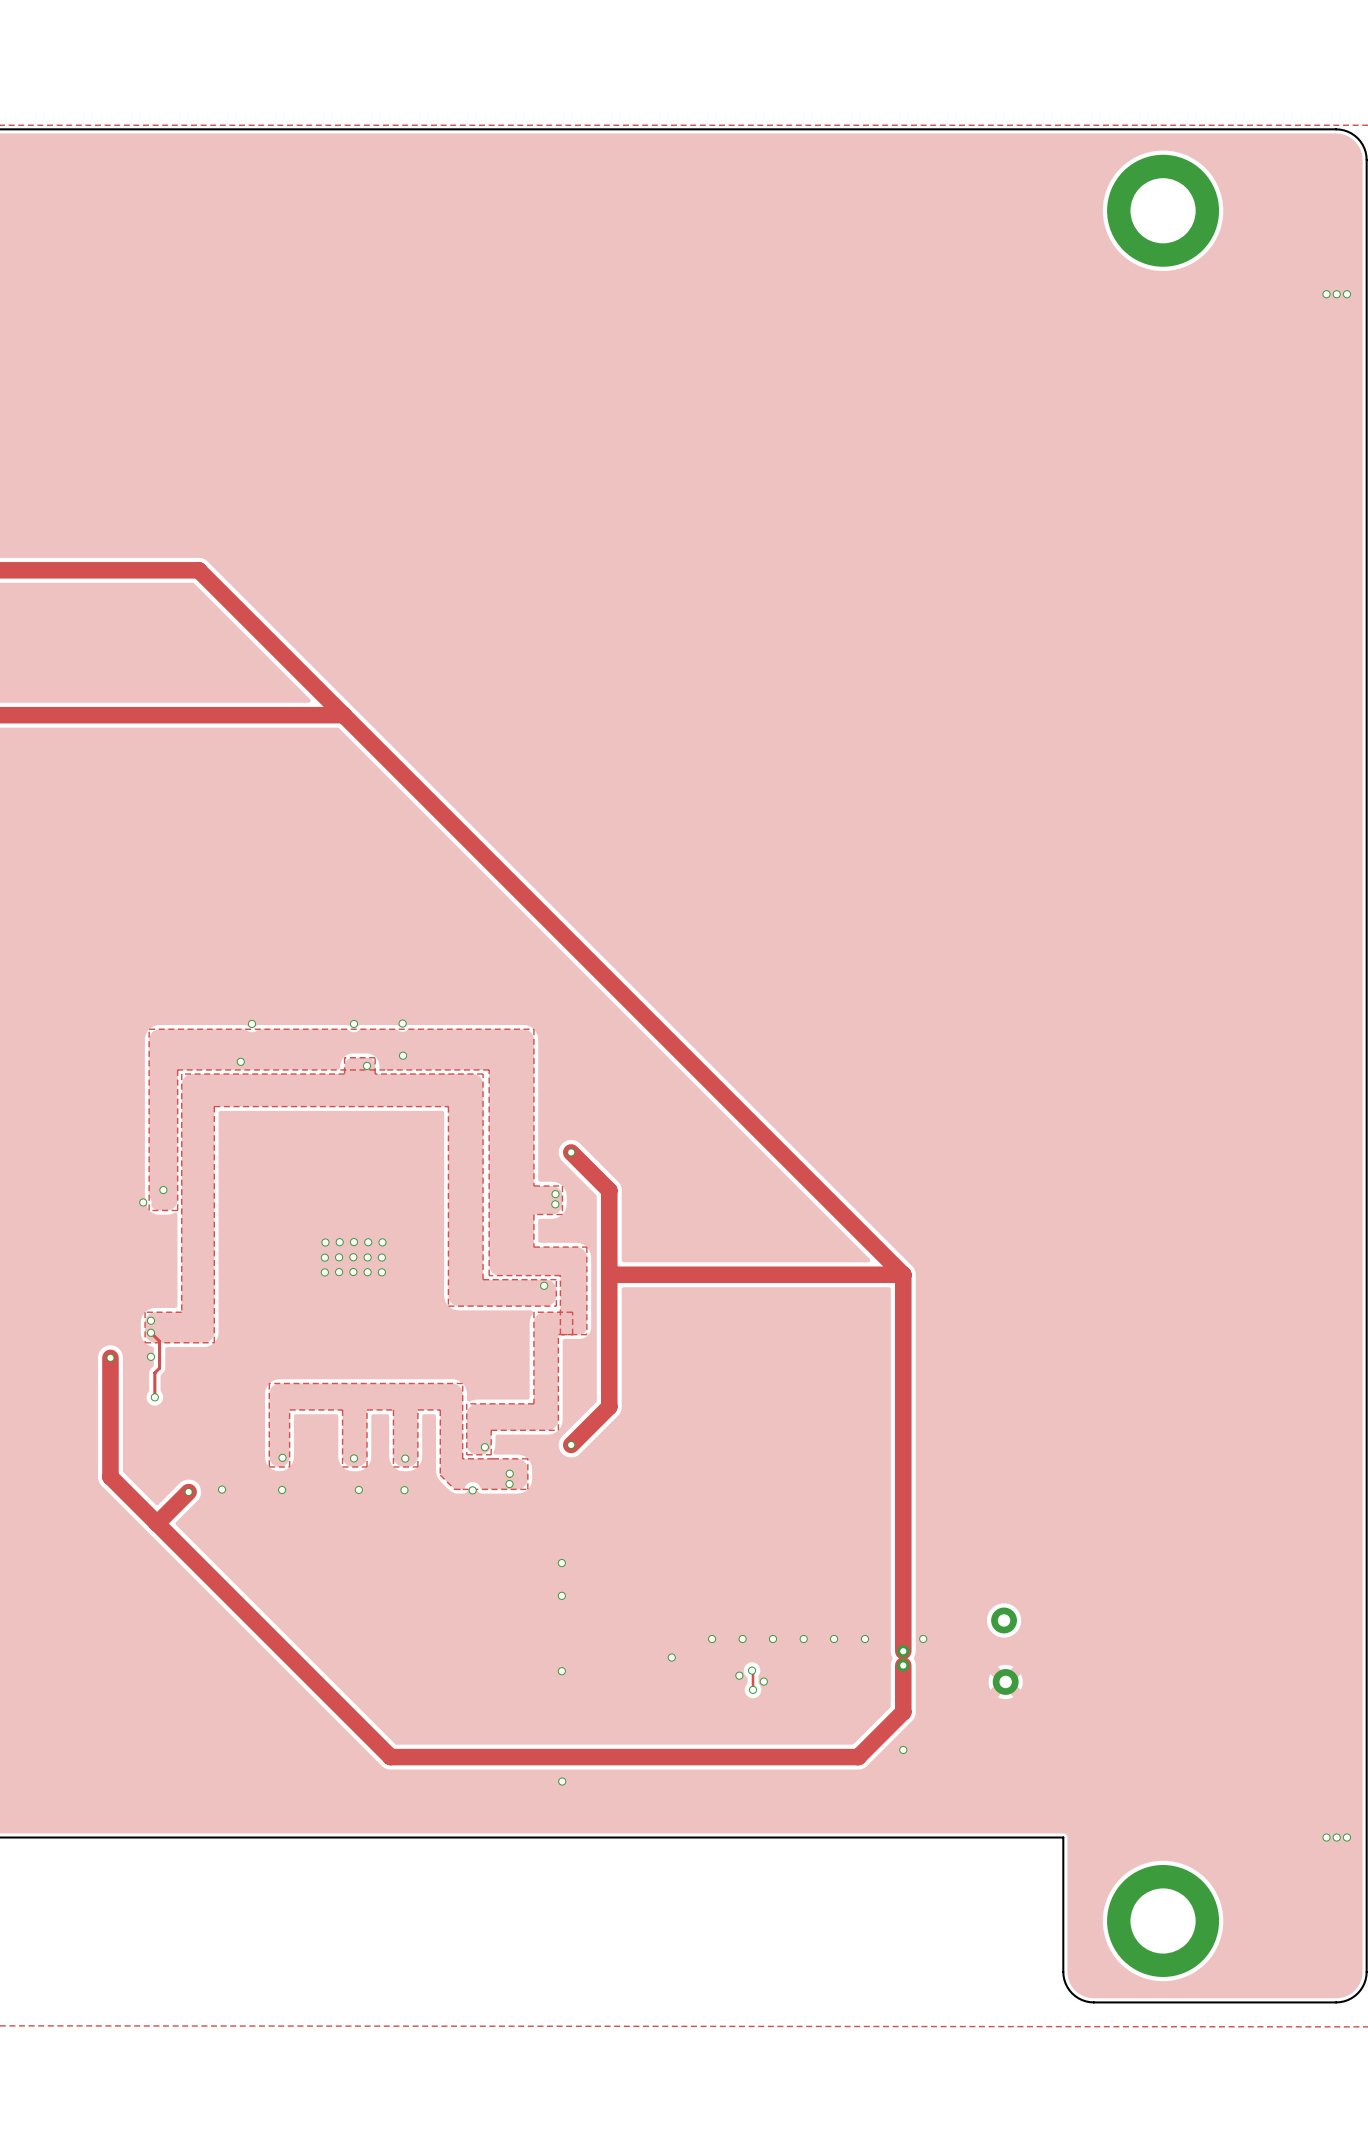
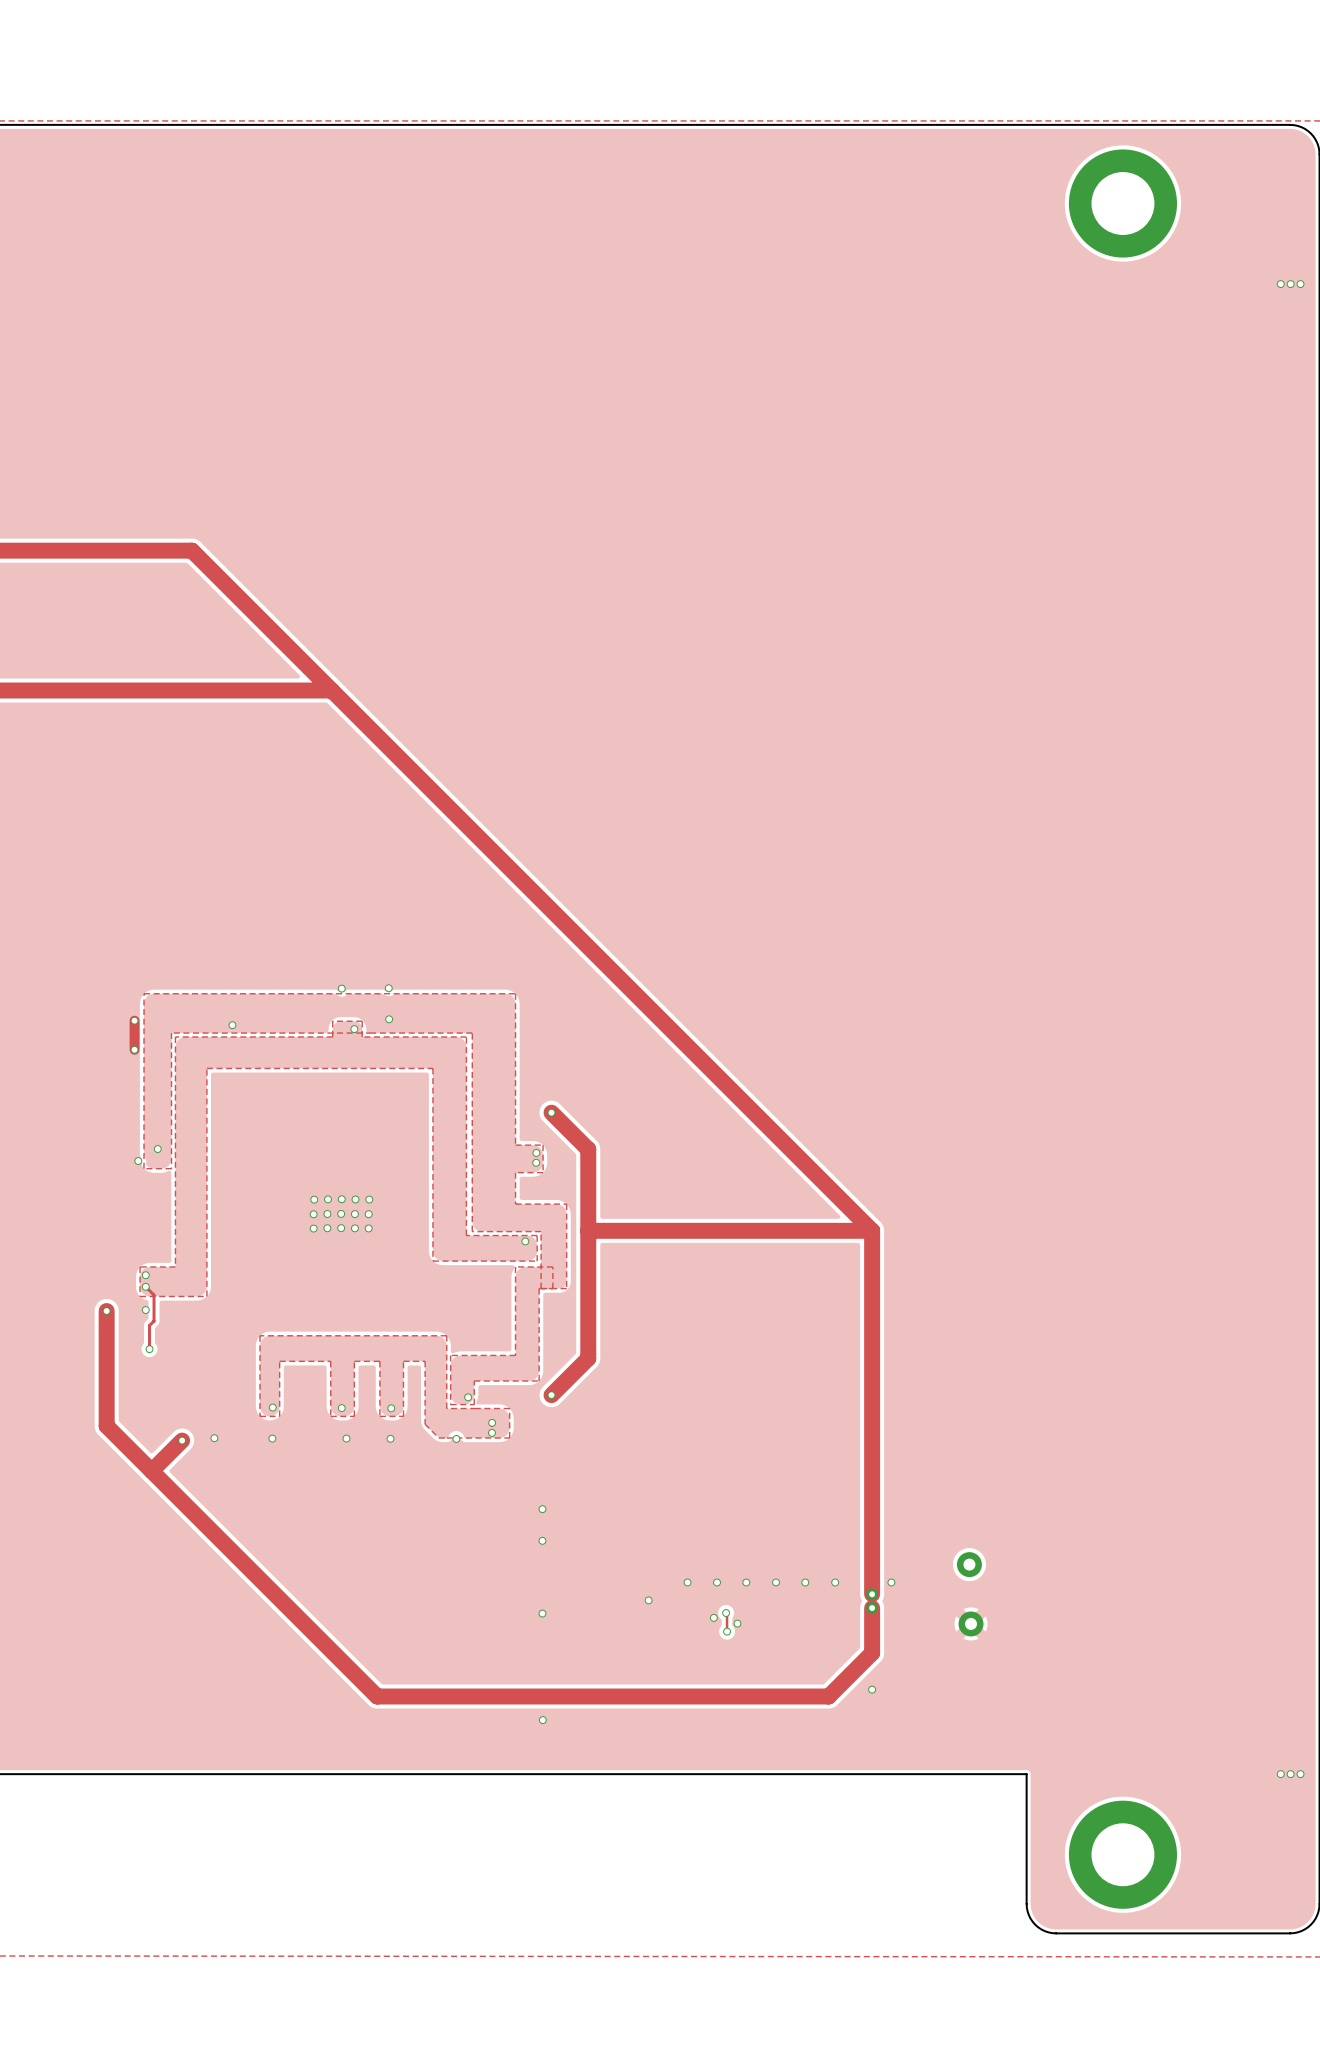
via: (251, 1023) -> none
track: none -> (134, 1020) (134, 1049)
via: none -> (134, 1020)
via: none -> (134, 1049)

